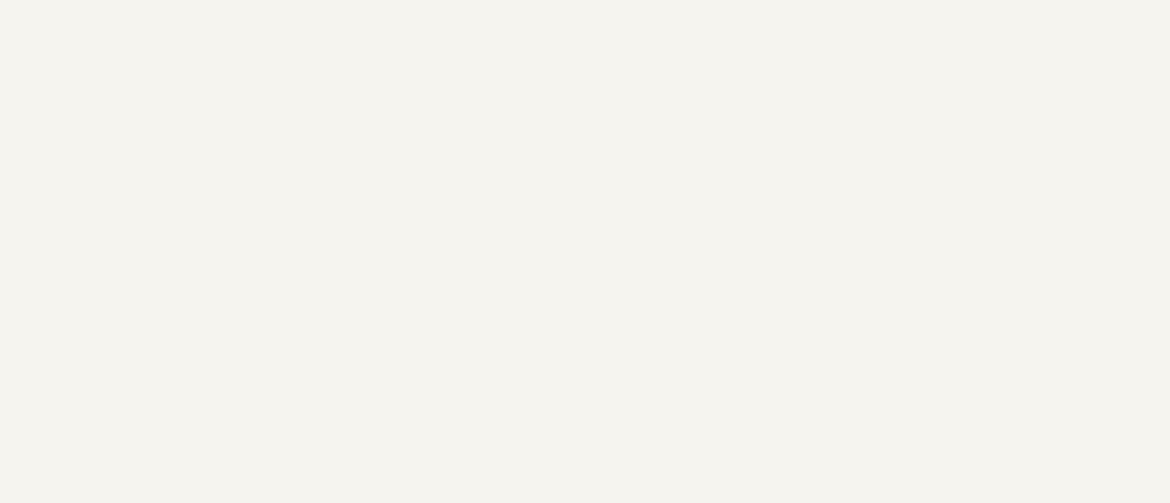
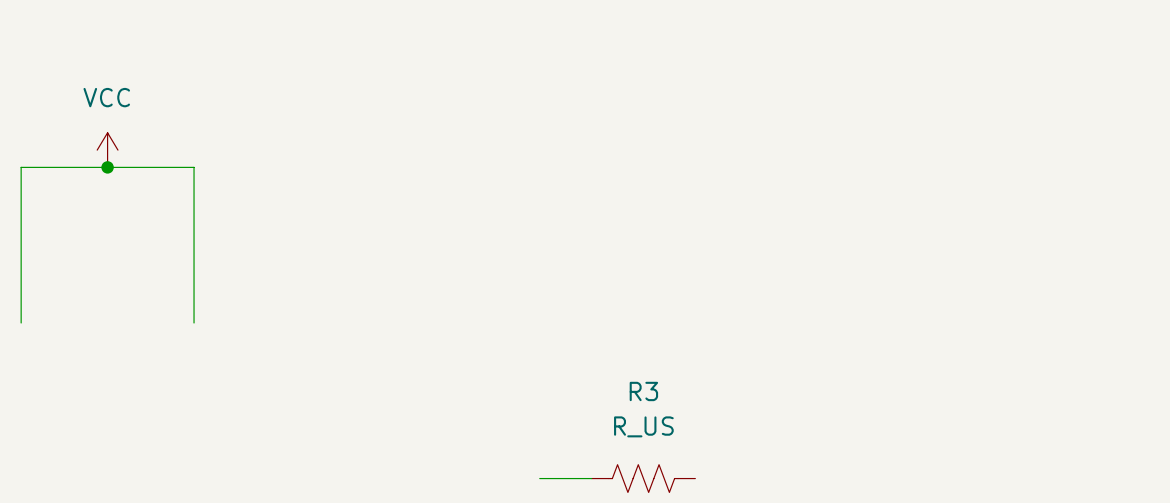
power symbol: none -> VCC (107, 150)
junction: none -> (107, 167)
wire: none -> (21, 322) (21, 167) (194, 167) (194, 322)
wire: none -> (539, 478) (591, 478)
R3: none -> R_US (643, 478)

